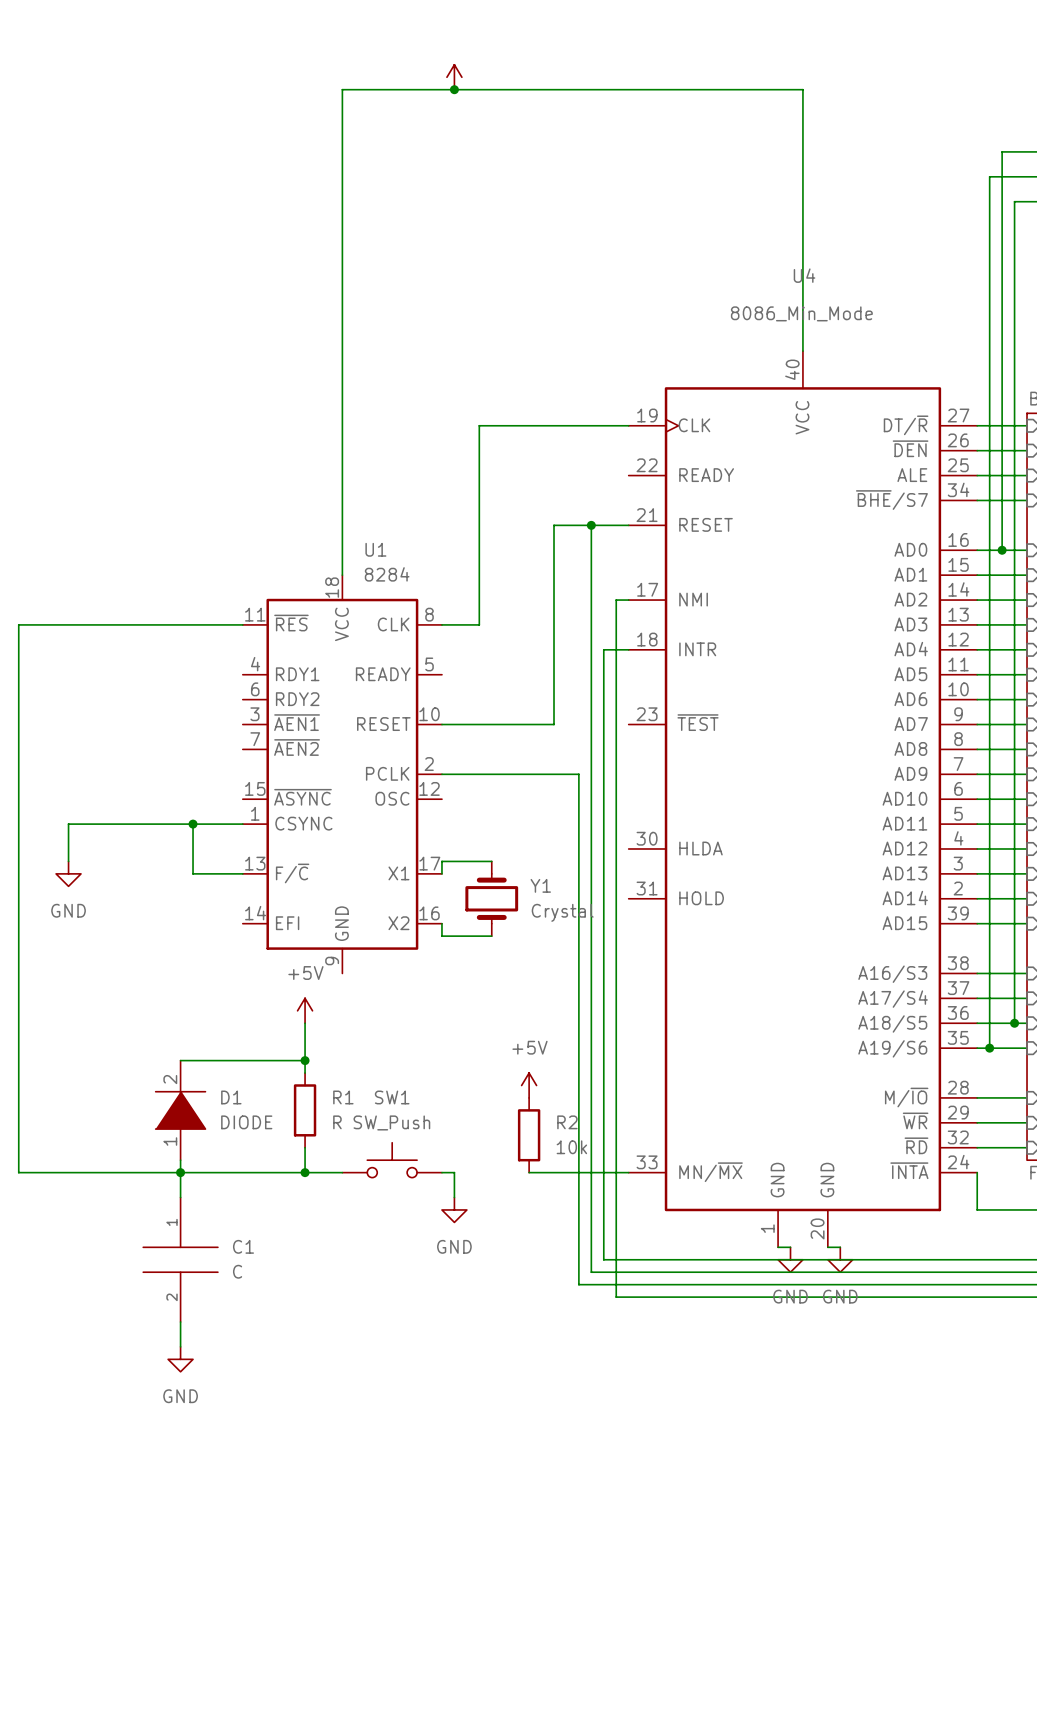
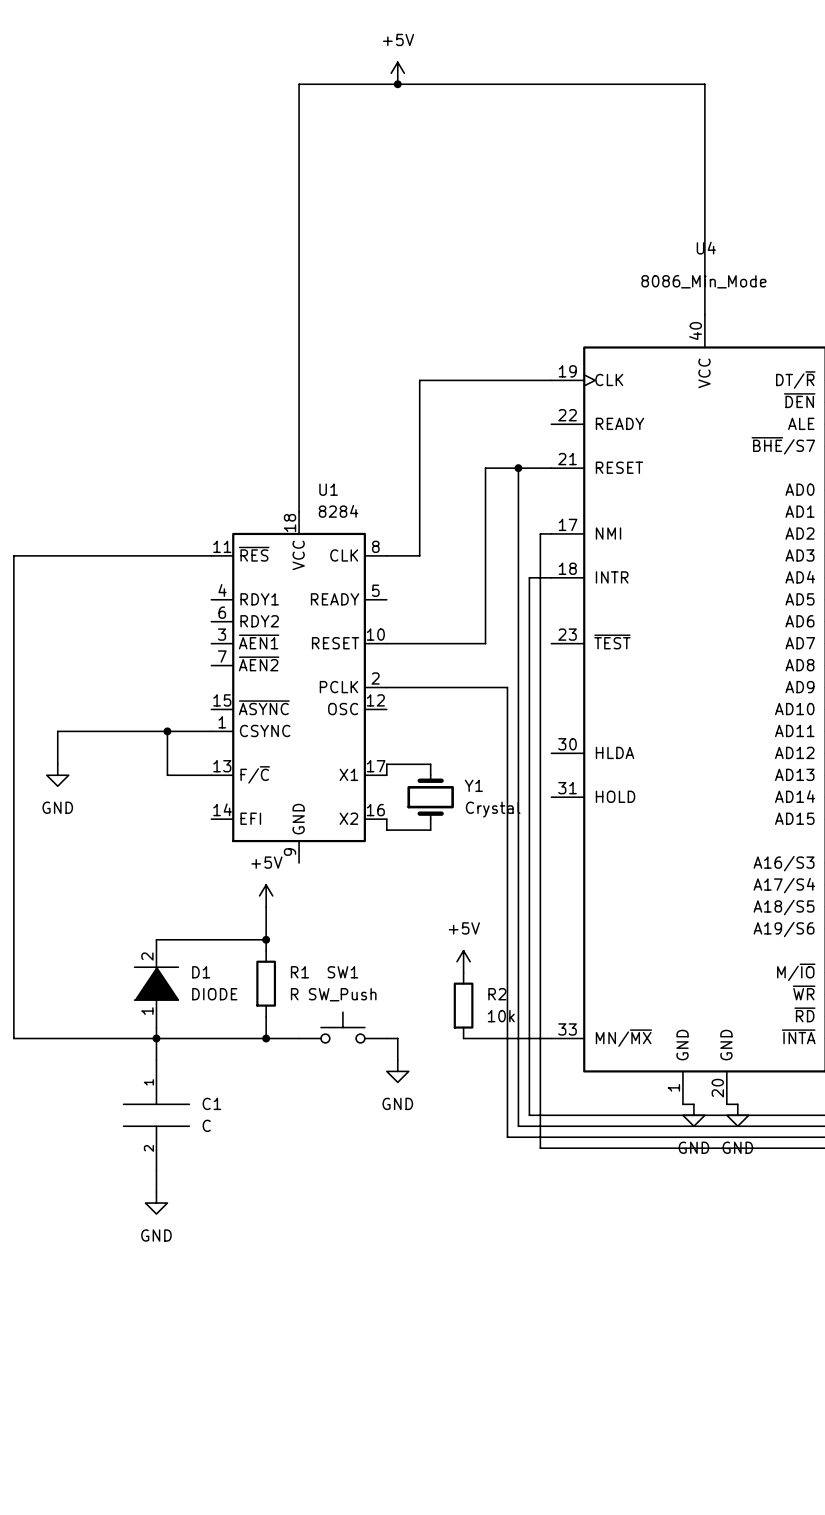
power symbol text: none -> +5V (398, 39)

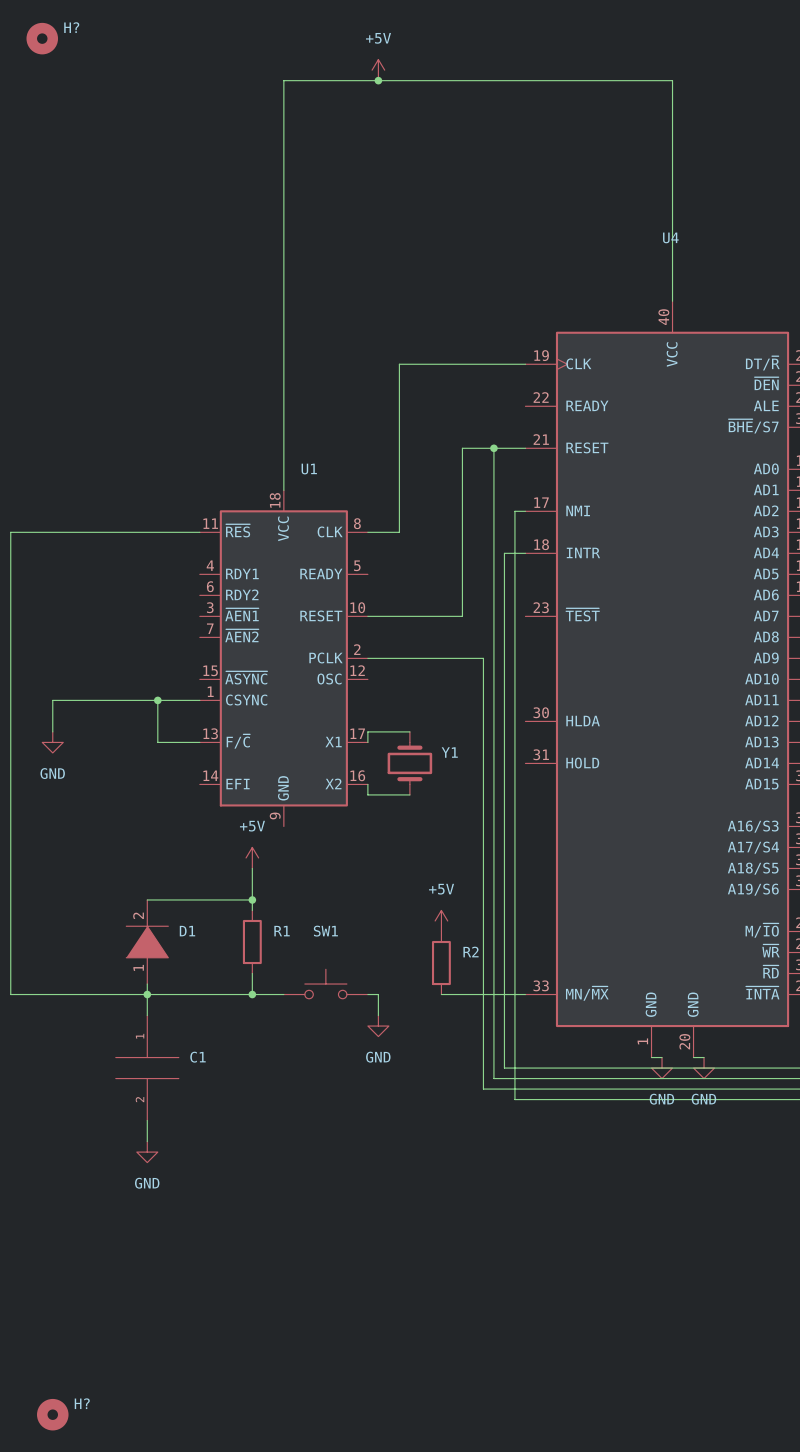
H?: none -> (42, 38)
U4 value: 8086_Min_Mode (703, 281) -> none
U1 value: 8284 (338, 511) -> none
Y1 value: Crystal (493, 809) -> none
D1 value: DIODE (214, 994) -> none
R1 value: R (294, 994) -> none
SW1 value: SW_Push (342, 994) -> none
R2 value: 10k (501, 1016) -> none
C1 value: C (206, 1125) -> none
H?: none -> (52, 1414)

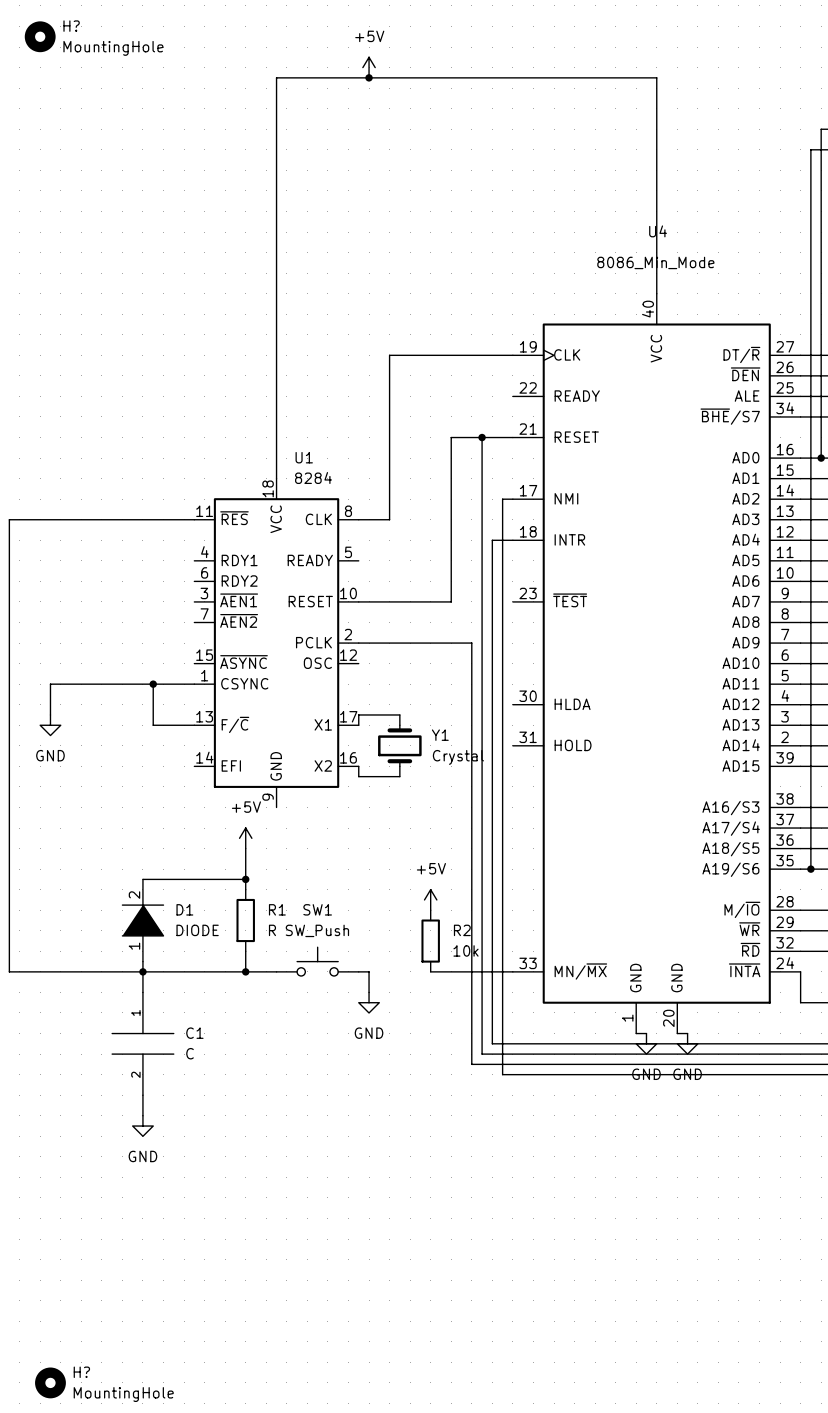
H? value: none -> MountingHole (113, 48)
U4 value: none -> 8086_Min_Mode (655, 262)
U1 value: none -> 8284 (313, 478)
Y1 value: none -> Crystal (458, 757)
D1 value: none -> DIODE (197, 930)
R1 value: none -> R (272, 930)
SW1 value: none -> SW_Push (317, 930)
R2 value: none -> 10k (465, 950)
C1 value: none -> C (190, 1053)
H? value: none -> MountingHole (123, 1394)

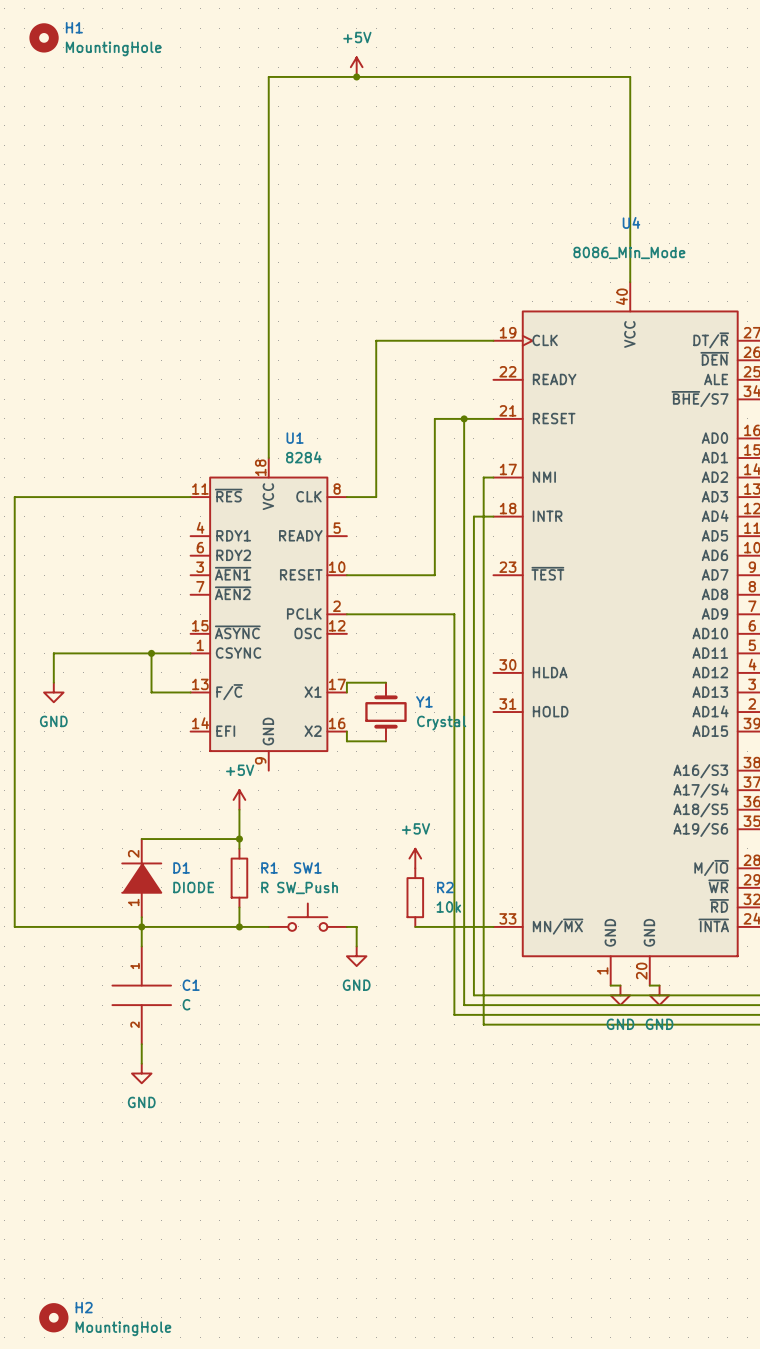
H? name: H? (71, 26) -> H1 (74, 27)
H? name: H? (81, 1372) -> H2 (84, 1307)

